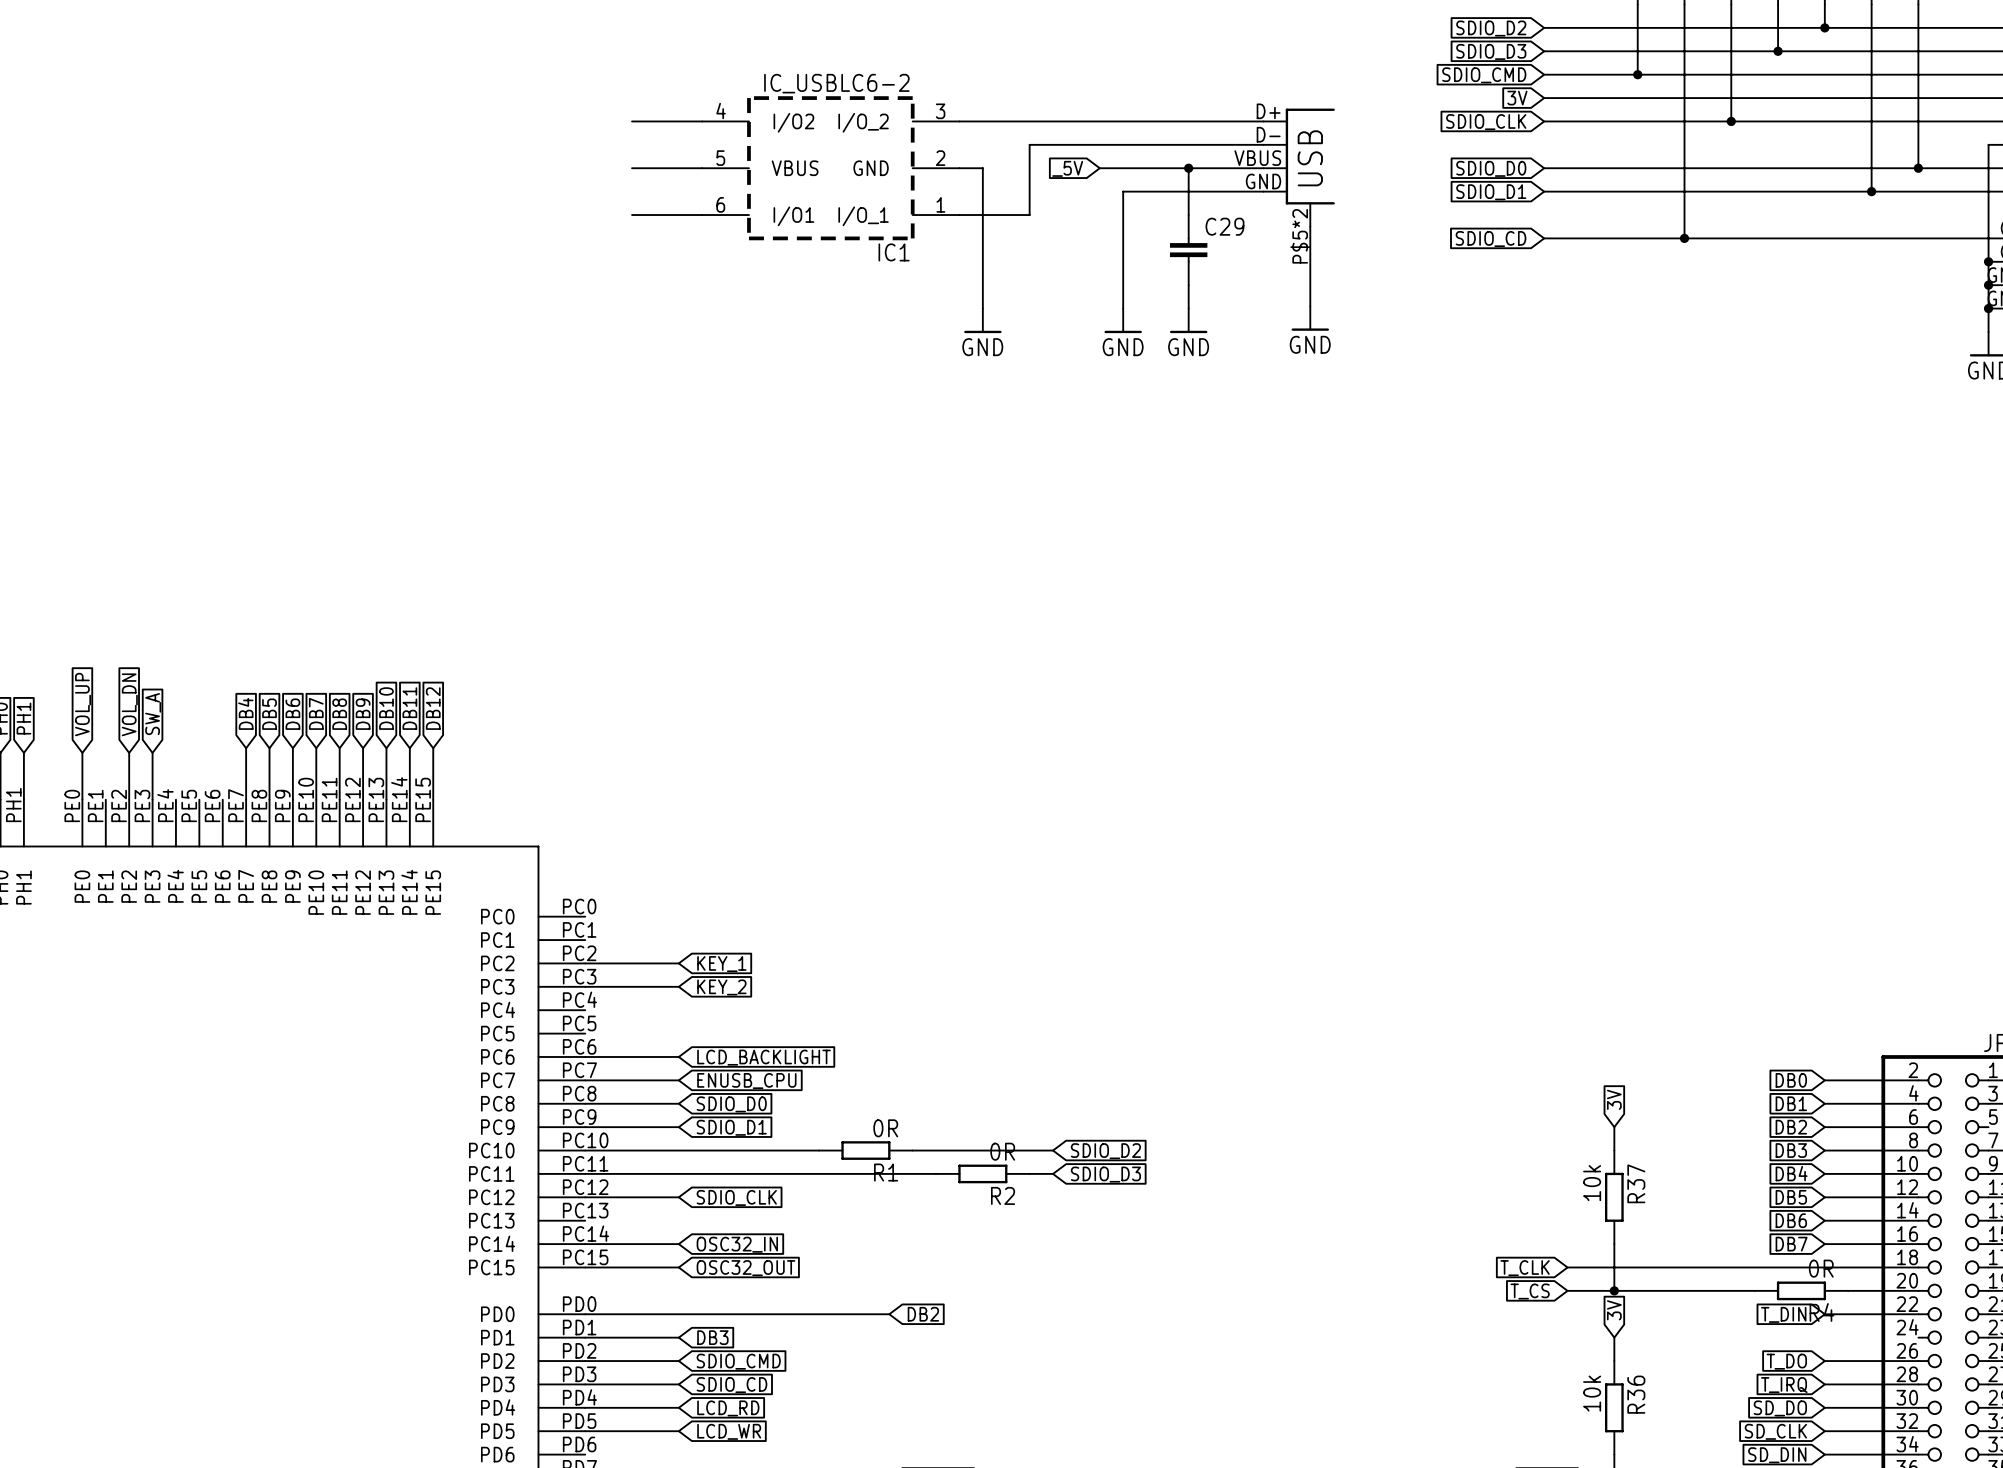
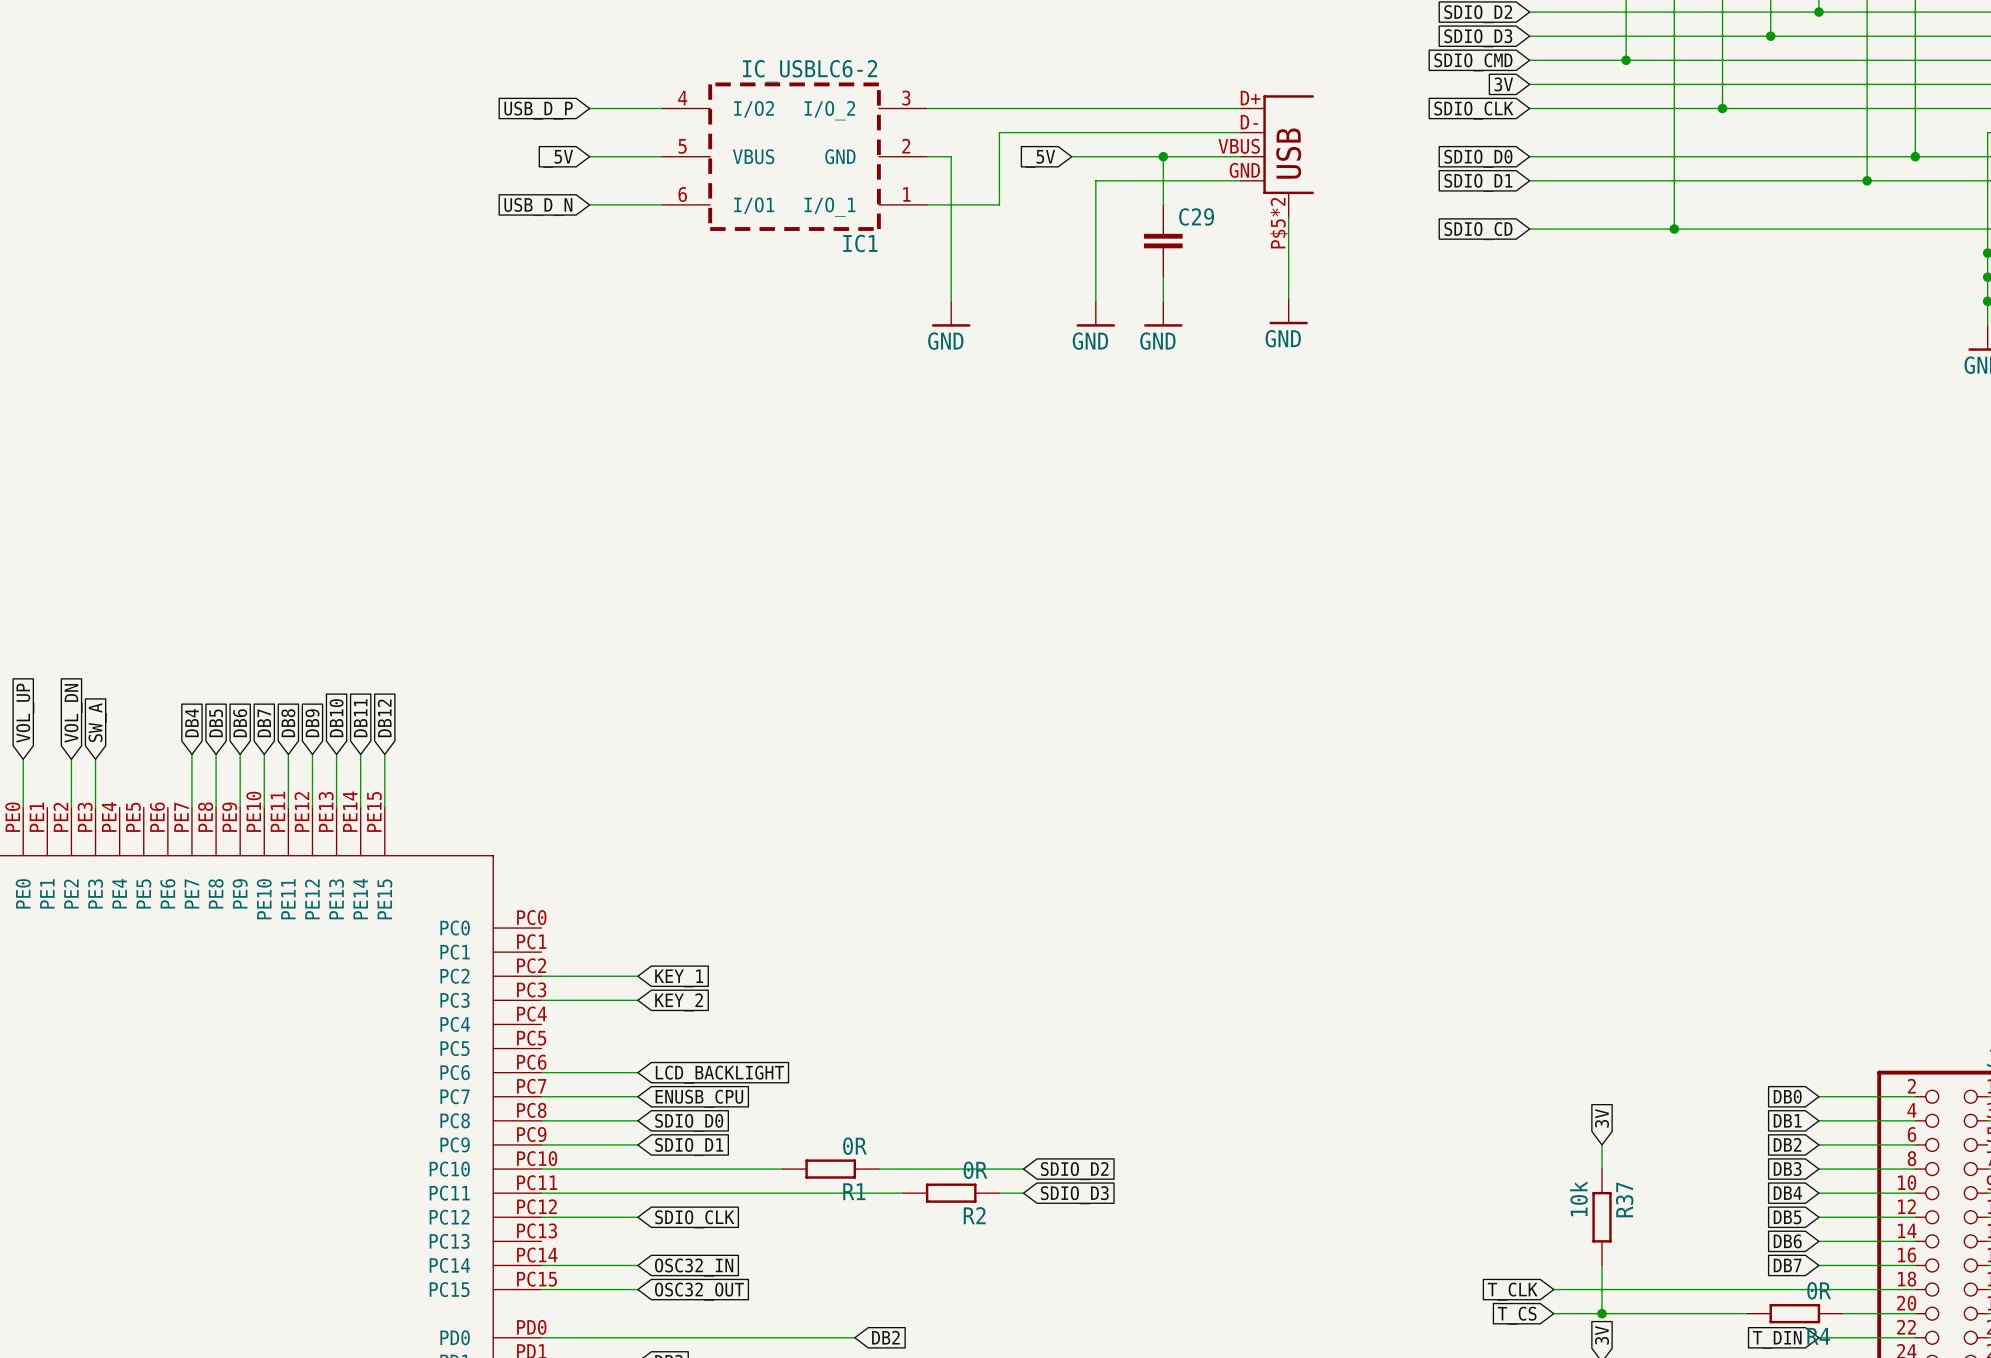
global label: none -> USB_D_P (538, 110)
global label: none -> _5V (558, 158)
global label: none -> USB_D_N (538, 206)

